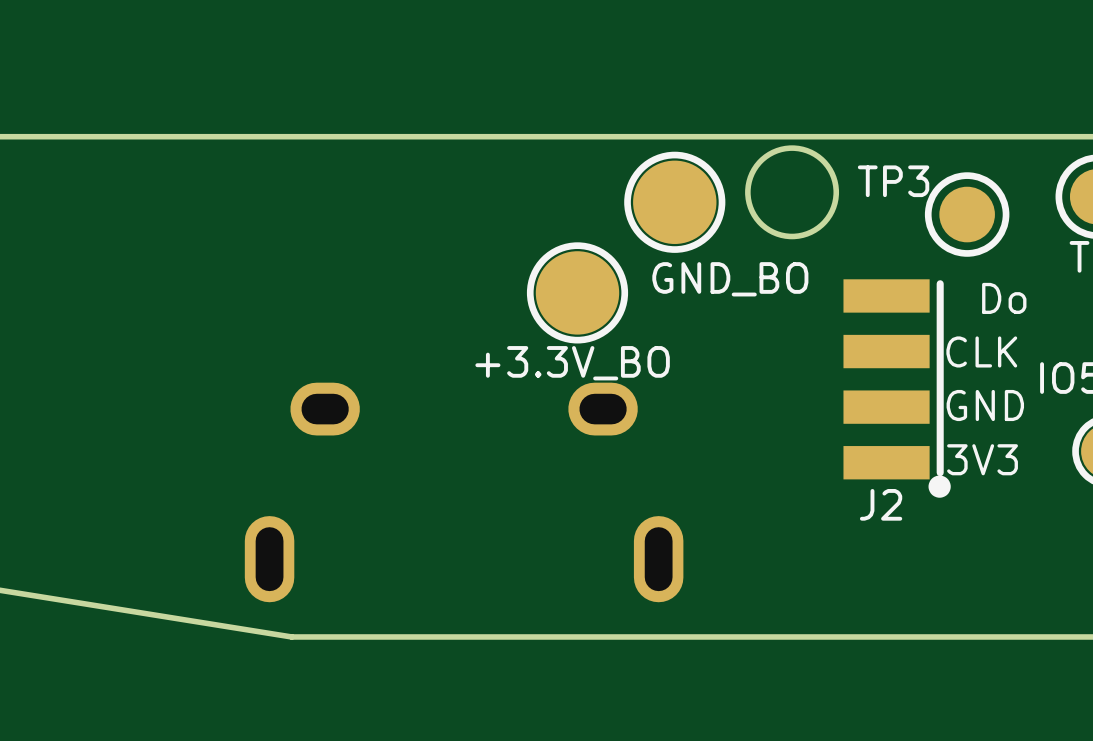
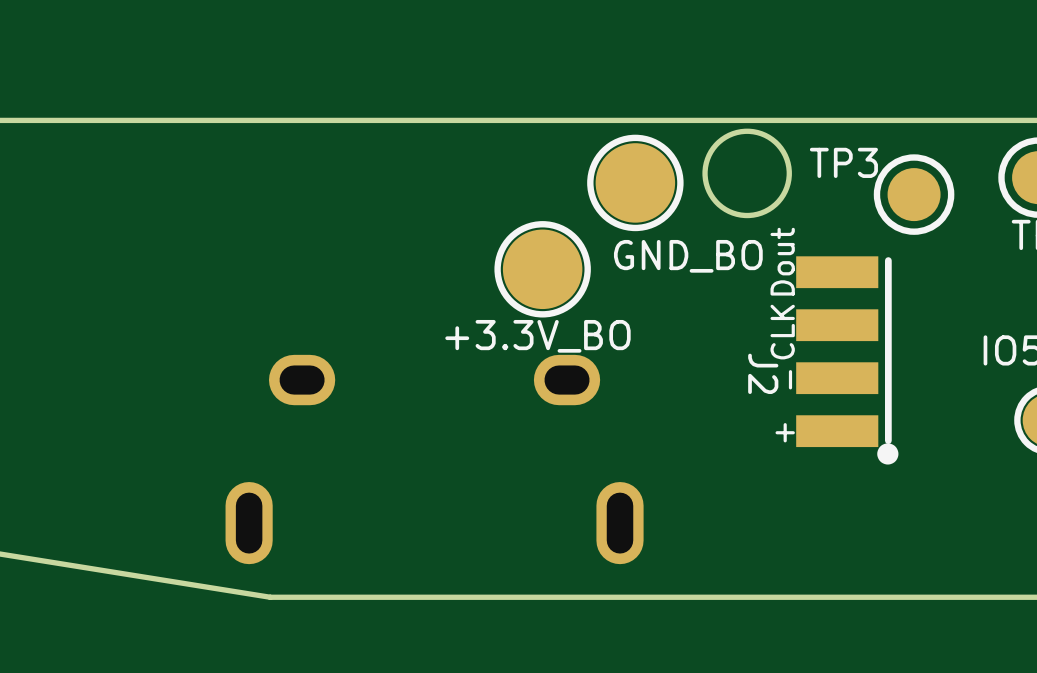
J2 text: none -> Dout (782, 261)
J2 text: Do (1004, 298) -> none
J2 text rotation: 0° (981, 351) -> 90° counterclockwise (782, 332)
J2 text position: CLK (981, 351) -> CLK (782, 332)
J2 text: GND (985, 405) -> none
J2 text: none -> - (790, 379)
J2 text: 3V3 (982, 459) -> none
J2 text: none -> + (785, 432)
J2 name rotation: 0° (881, 504) -> 90° clockwise (763, 373)
J2 name position: J2 (881, 504) -> J2 (763, 373)

